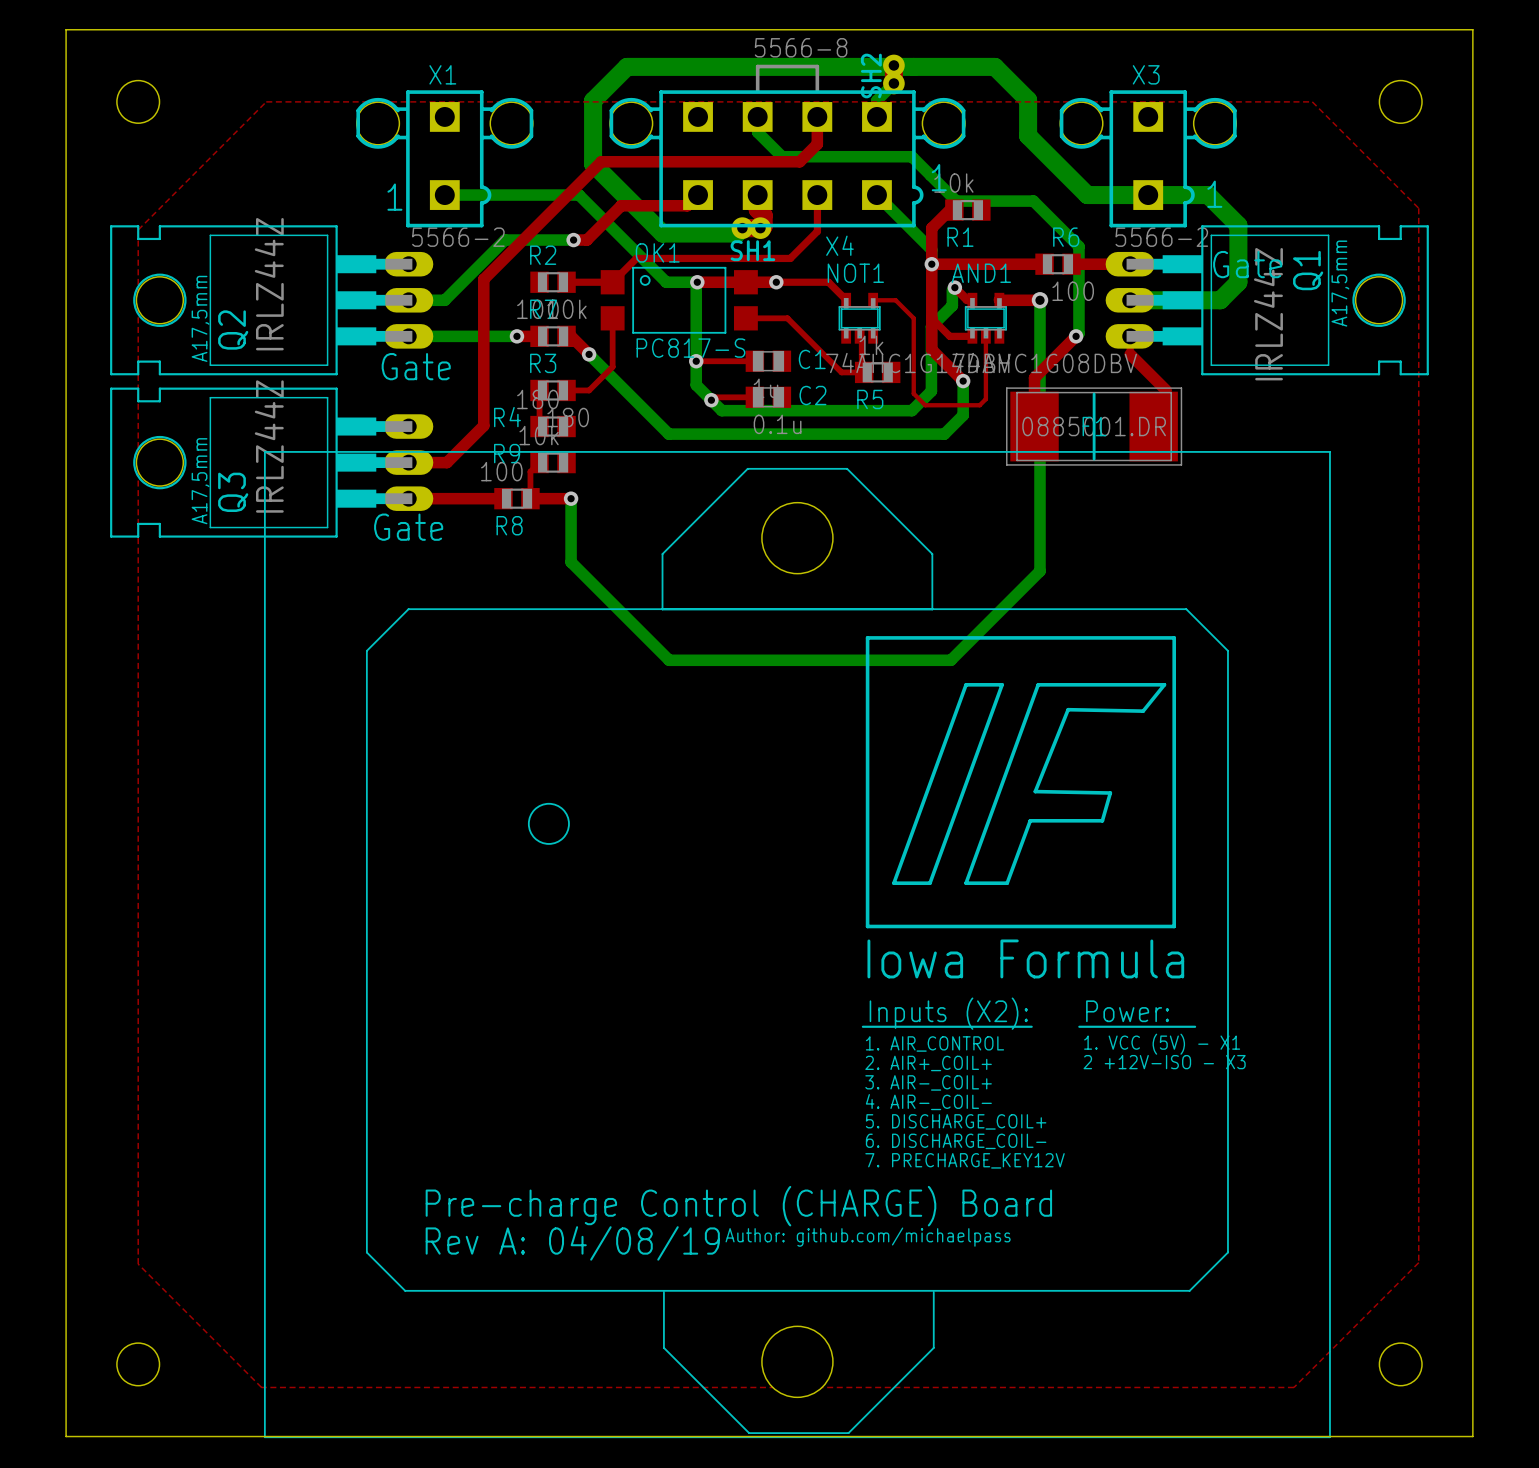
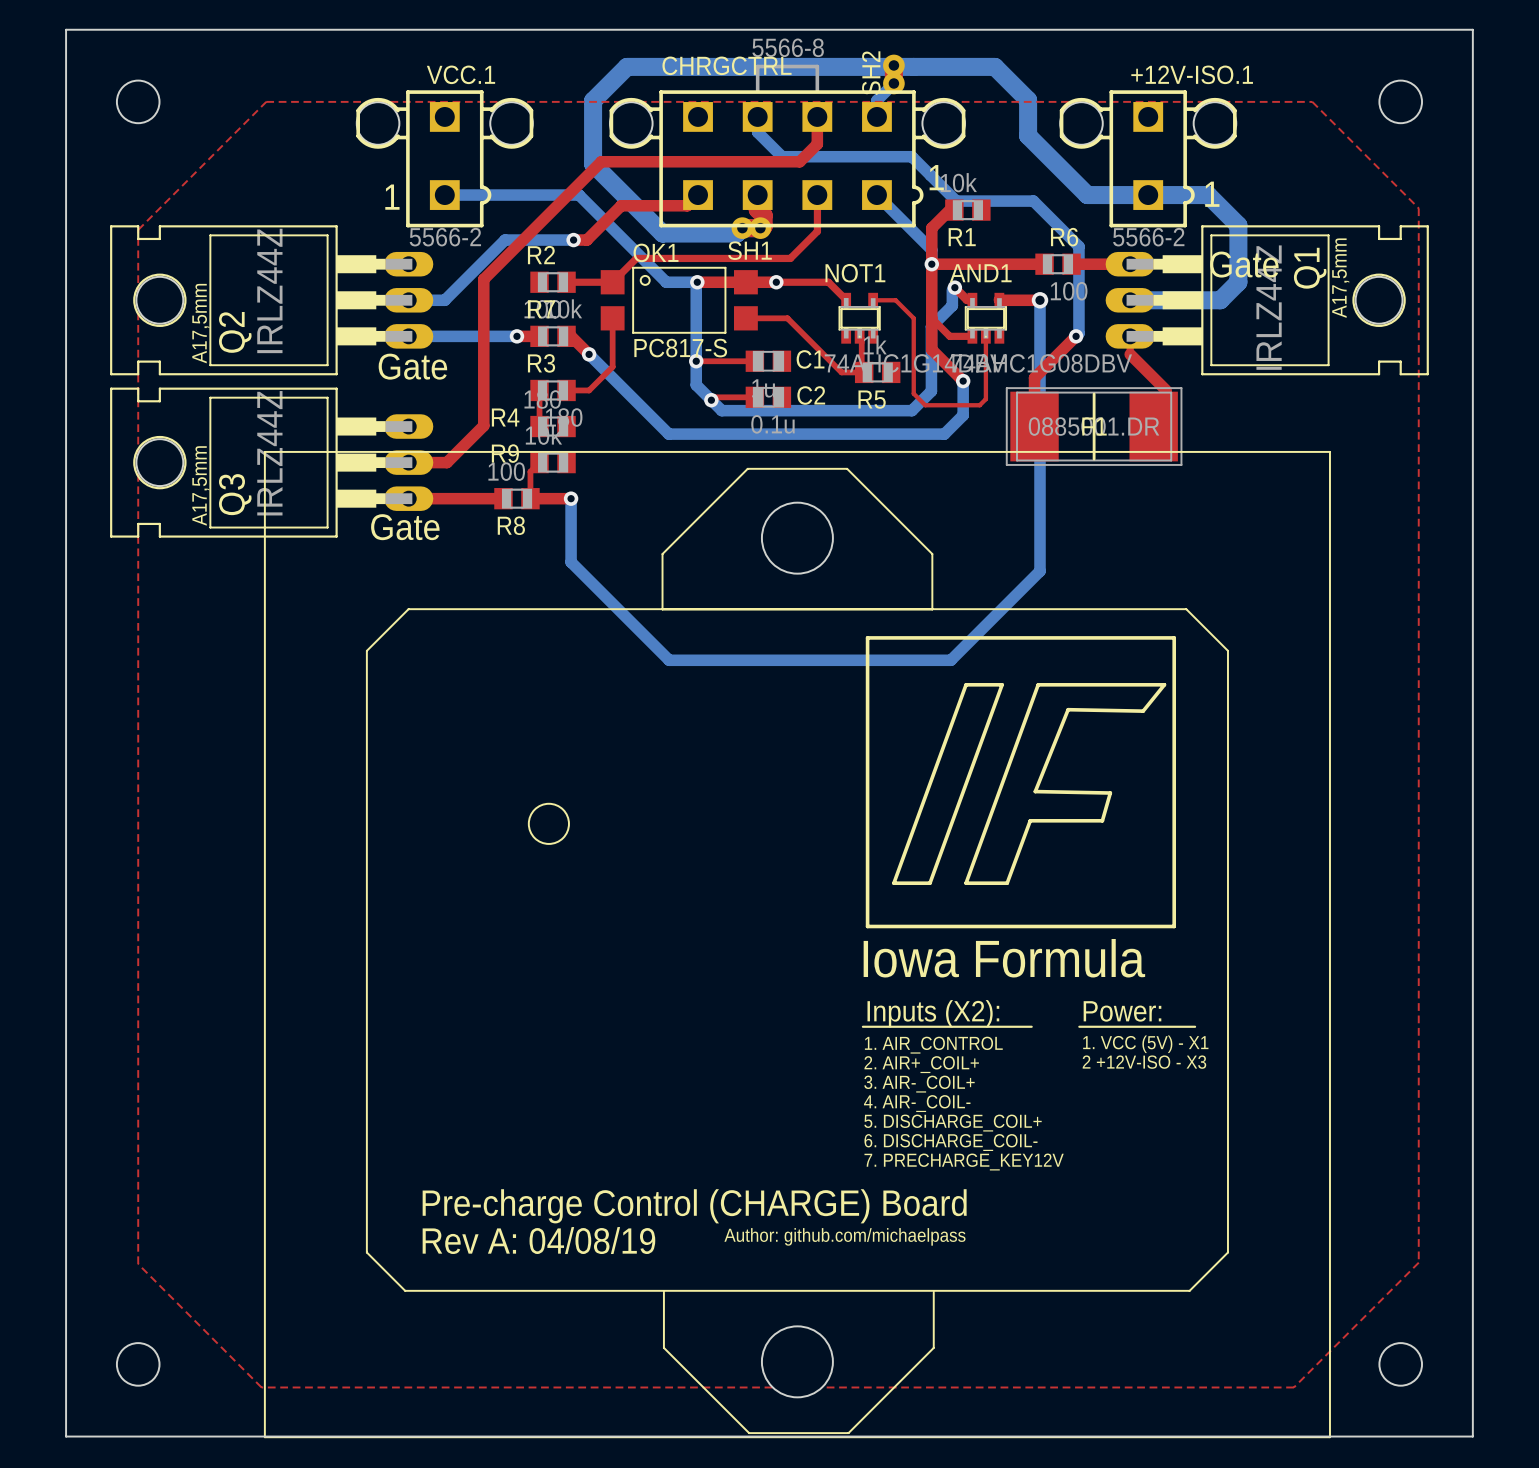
X1 name: X1 (442, 74) -> VCC.1 (461, 74)
X3 name: X3 (1146, 74) -> +12V-ISO.1 (1192, 74)
X4 name: X4 (839, 245) -> CHRGCTRL (727, 65)

